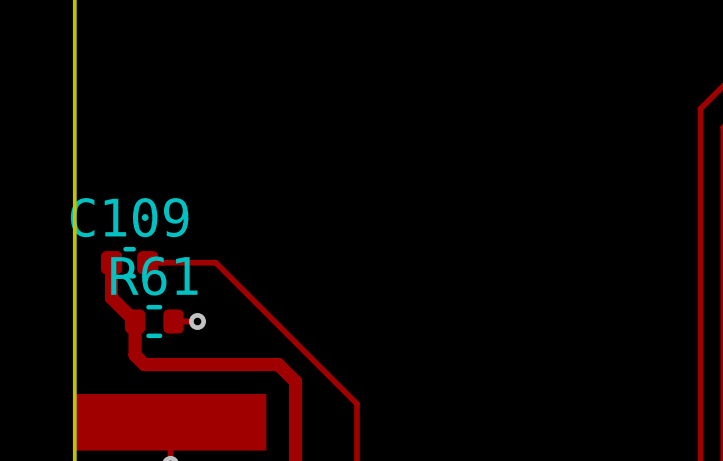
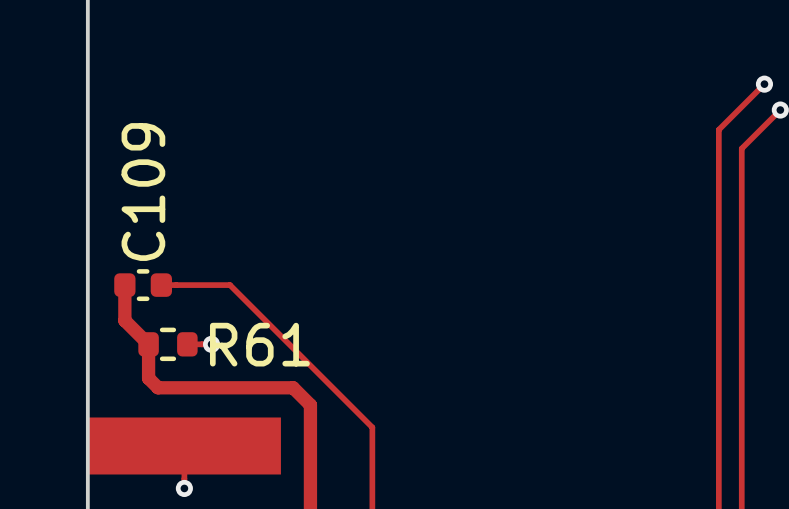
C109 name rotation: 0° (129, 217) -> 90° counterclockwise (143, 192)
R61 name position: R61 (154, 276) -> R61 (259, 344)

